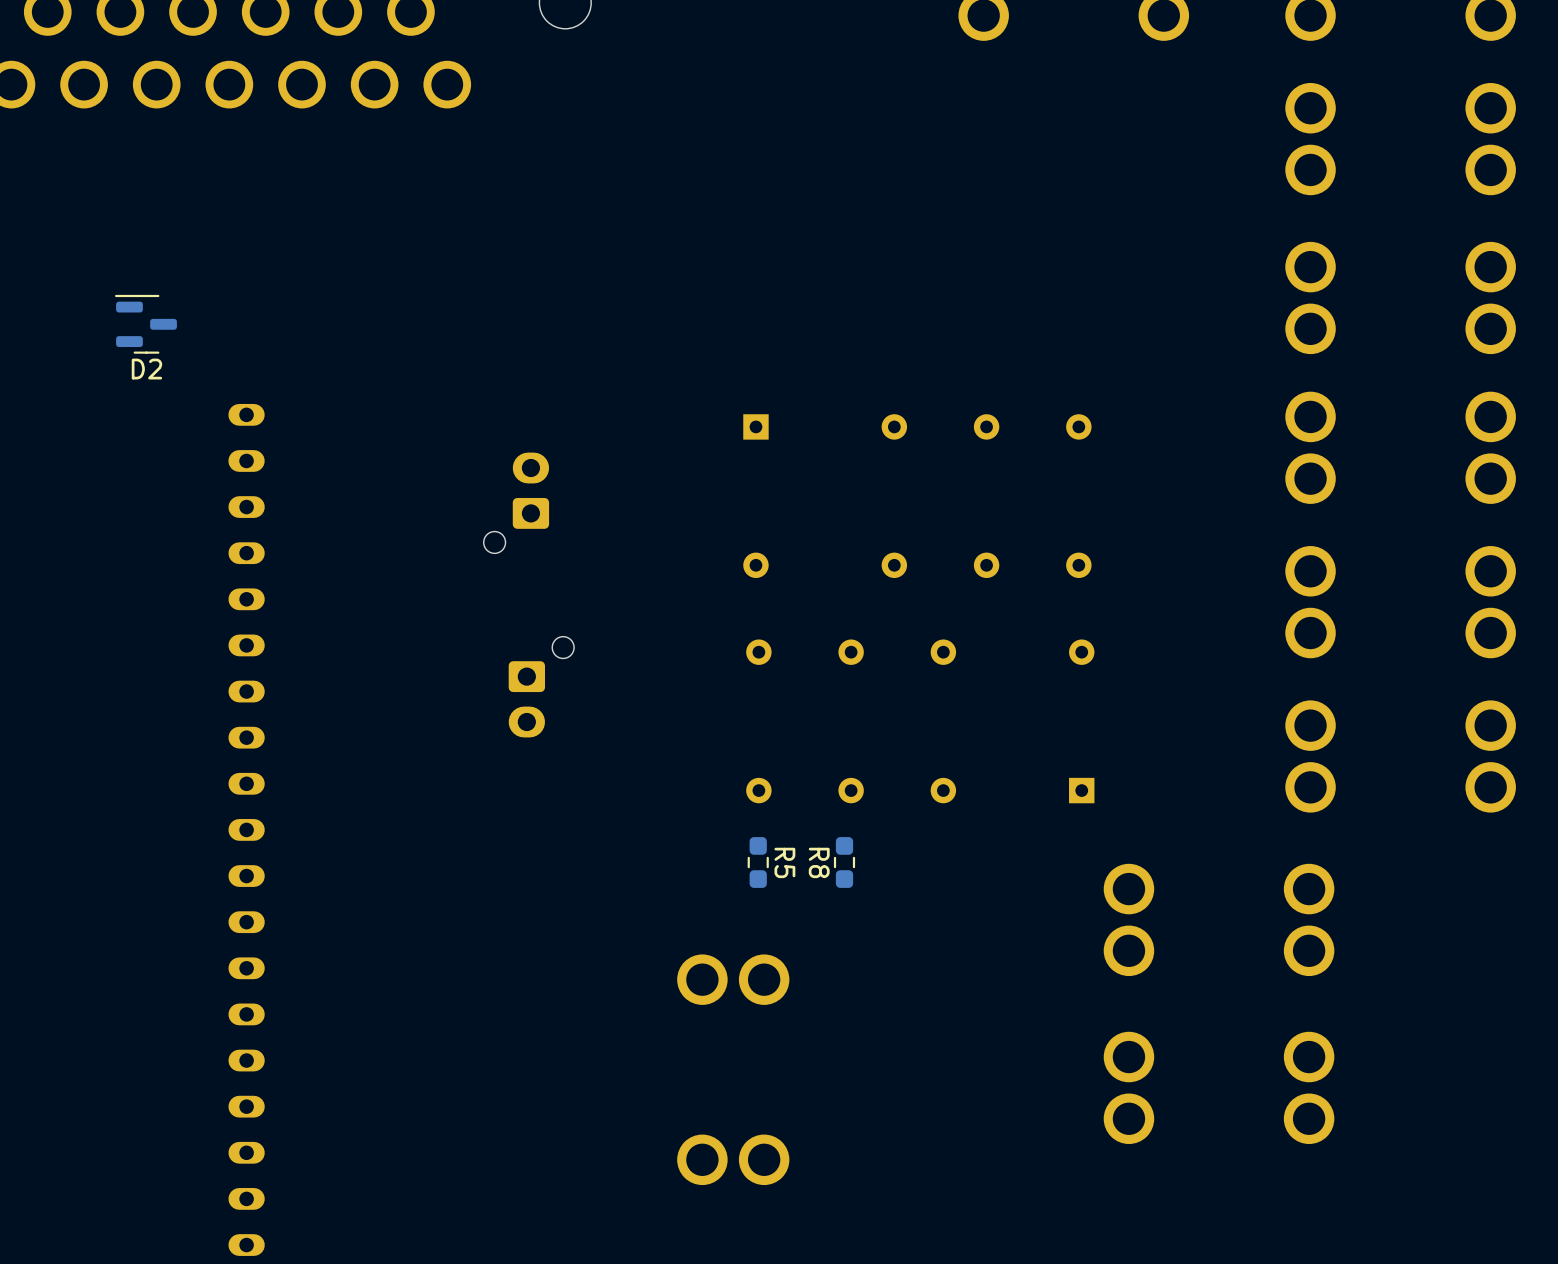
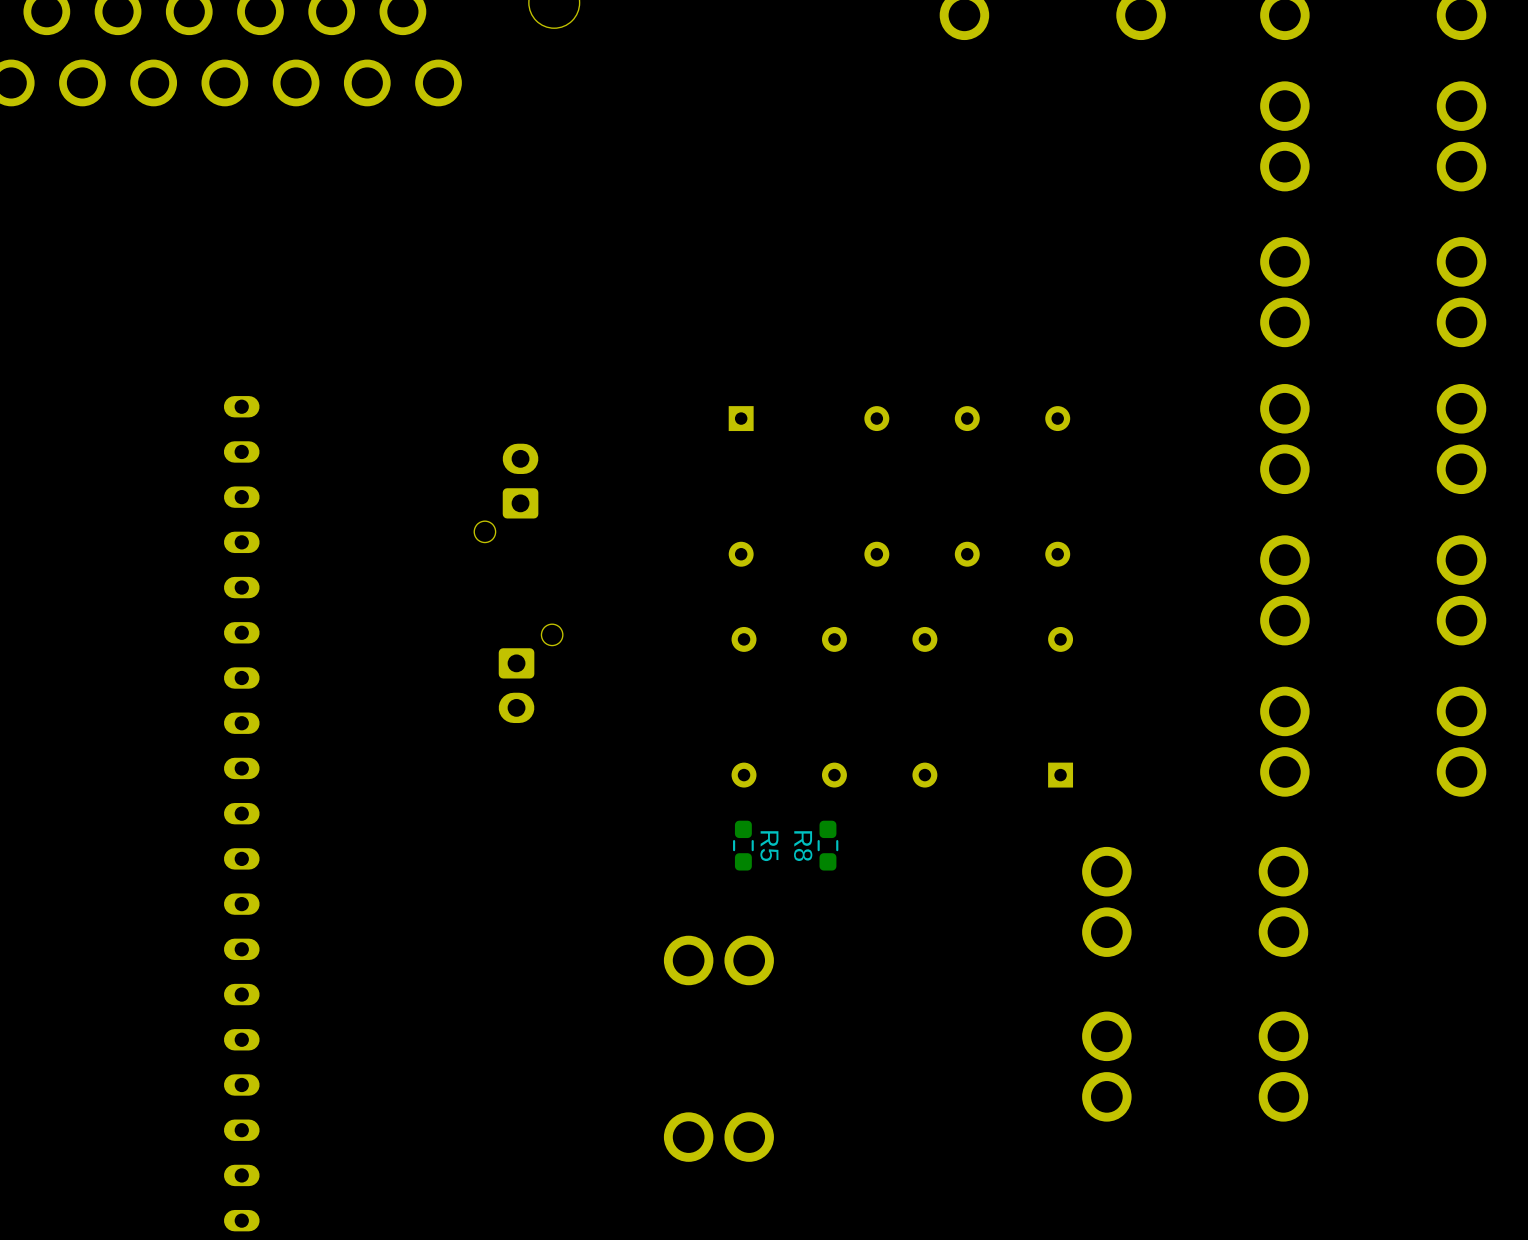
D2: (145, 324) -> none

